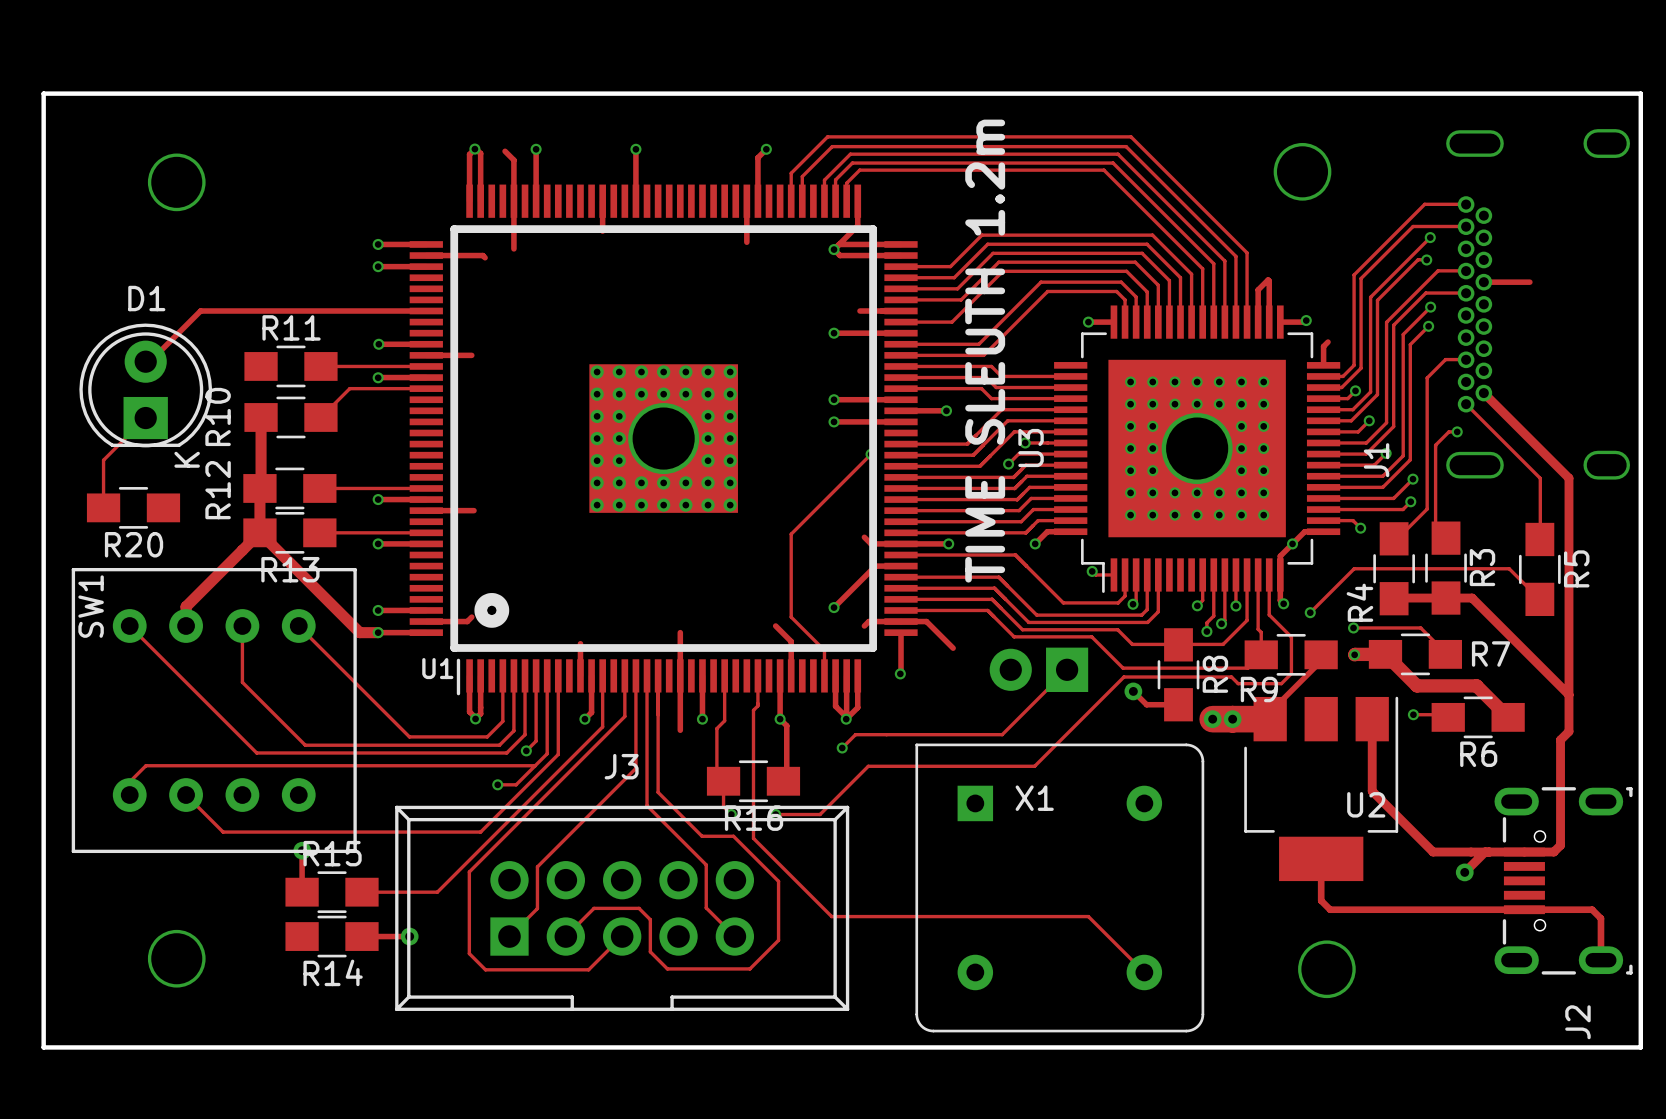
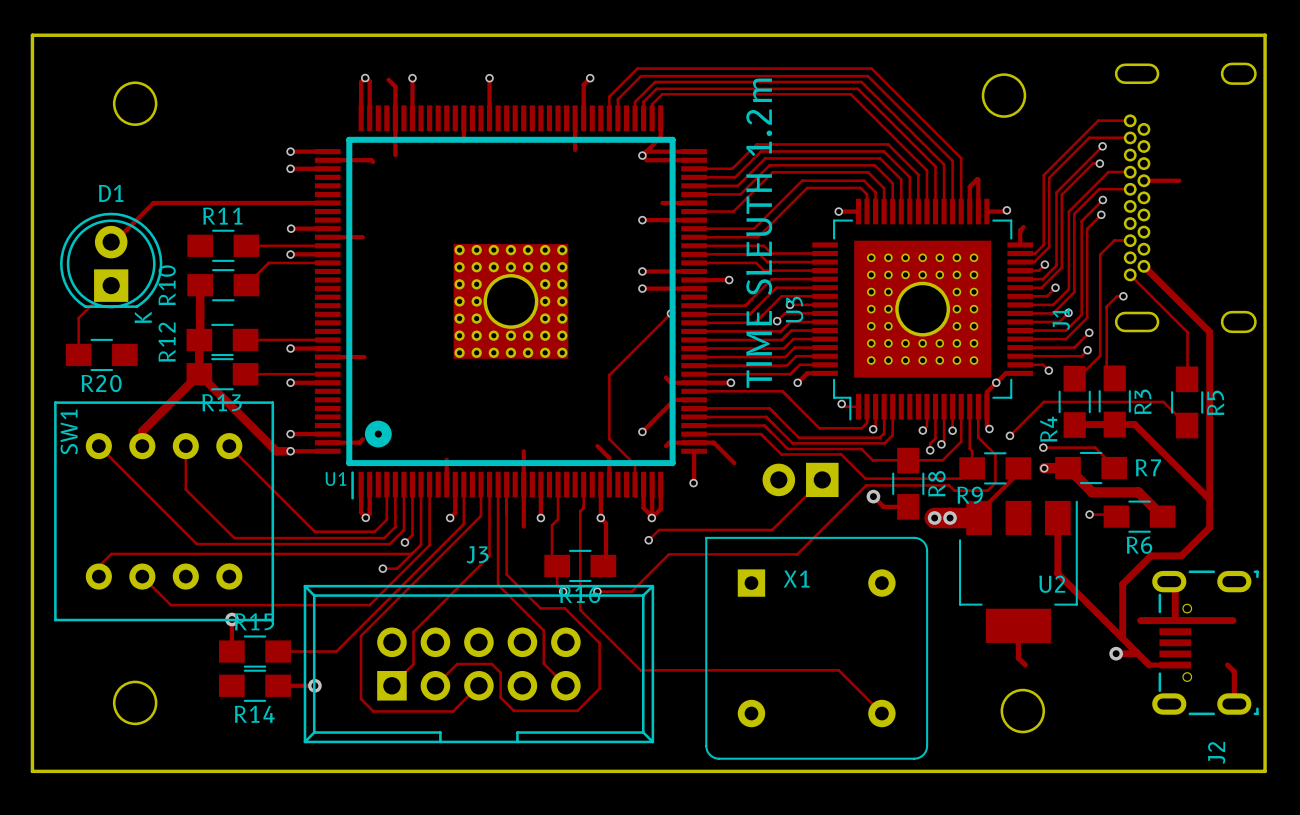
track: (1560, 740) (1560, 845) (1553, 852) -> (1203, 534) (1181, 555) (1150, 555) (1122, 584) (1122, 638)
track: none -> (1169, 581) (1175, 587) (1175, 620)
track: (1433, 852) (1479, 852) -> (1104, 620) (1149, 665)
track: (1485, 852) (1464, 872) -> none
track: none -> (1197, 620) (1233, 620)
via position: (1464, 872) -> (1116, 653)
track: none -> (1136, 652) (1116, 653)
track: (1330, 909) (1490, 909) -> none
track: (1524, 909) (1592, 909) -> none

